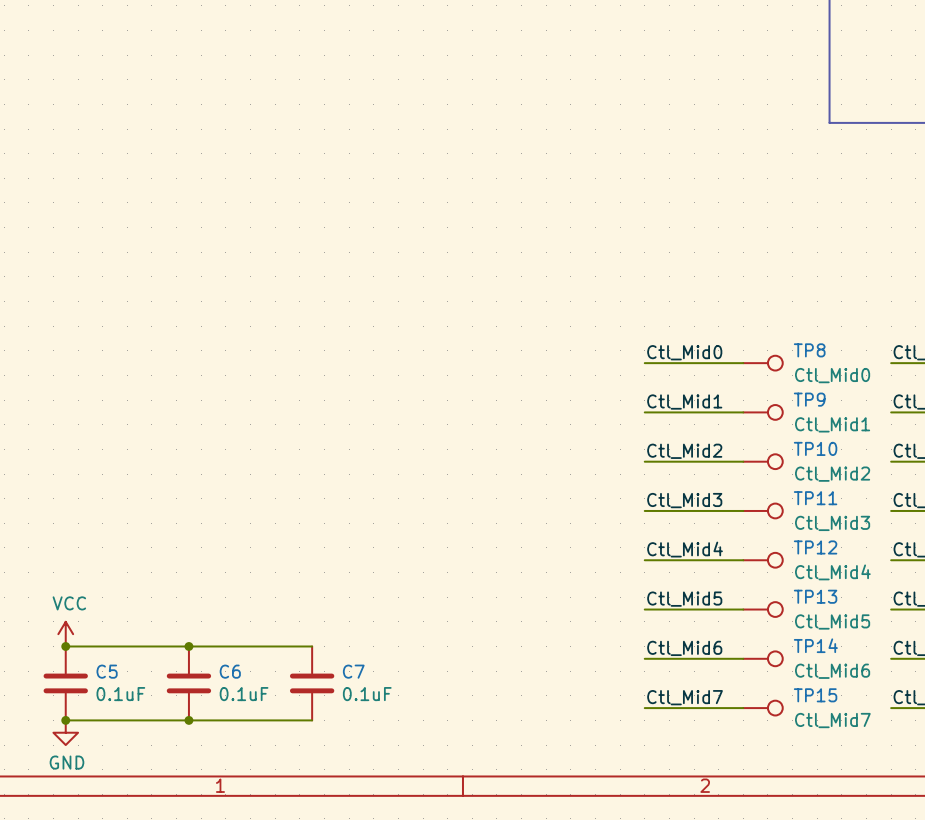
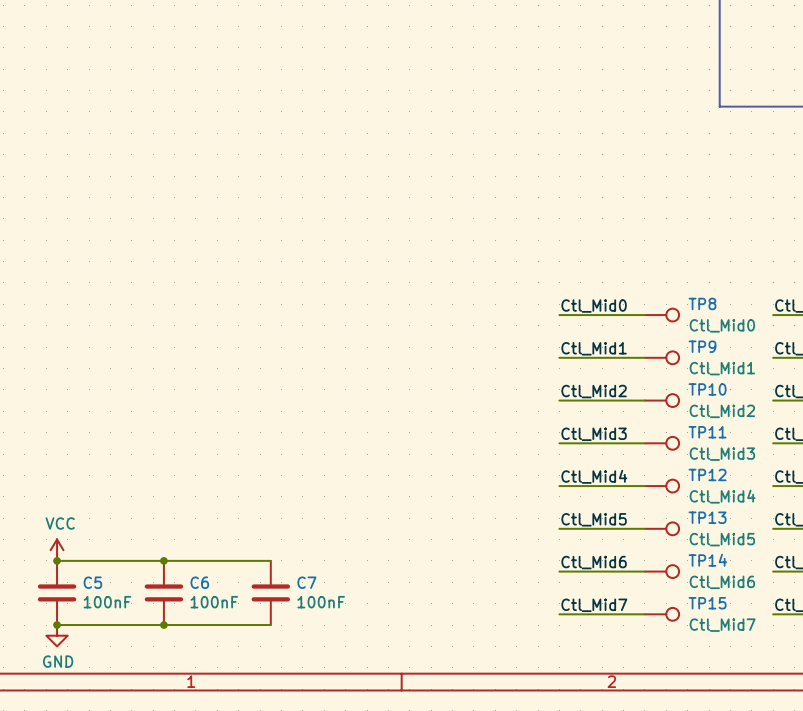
C5 value: 0.1uF (120, 694) -> 100nF (107, 602)
C6 value: 0.1uF (244, 694) -> 100nF (214, 602)
C7 value: 0.1uF (367, 694) -> 100nF (321, 602)

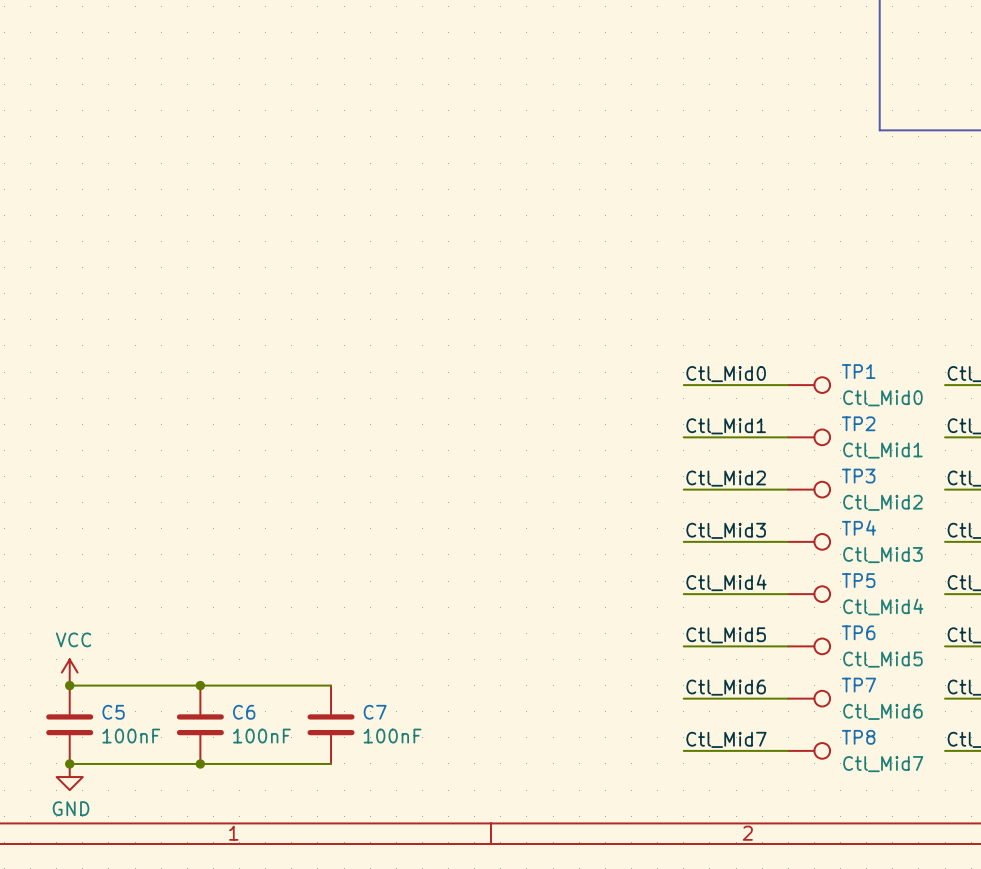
TP8 name: TP8 (702, 303) -> TP1 (858, 371)
TP9 name: TP9 (702, 346) -> TP2 (858, 423)
TP10 name: TP10 (707, 389) -> TP3 (858, 476)
TP11 name: TP11 (707, 432) -> TP4 (858, 528)
TP12 name: TP12 (707, 474) -> TP5 (858, 580)
TP13 name: TP13 (707, 517) -> TP6 (858, 632)
TP14 name: TP14 (707, 560) -> TP7 (858, 685)
TP15 name: TP15 (707, 603) -> TP8 (858, 737)

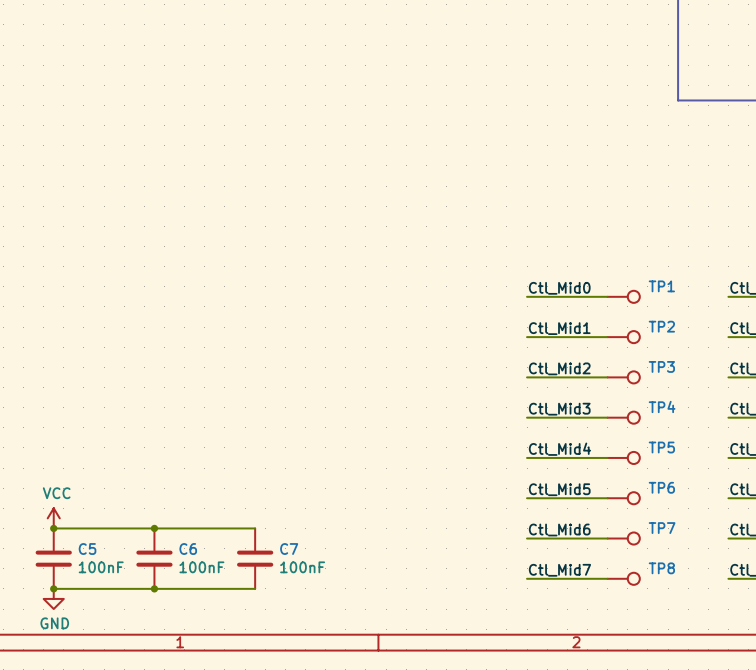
TP1 value: Ctl_Mid0 (882, 398) -> none
TP2 value: Ctl_Mid1 (882, 450) -> none
TP3 value: Ctl_Mid2 (882, 502) -> none
TP4 value: Ctl_Mid3 (882, 555) -> none
TP5 value: Ctl_Mid4 (883, 607) -> none
TP6 value: Ctl_Mid5 (882, 659) -> none
TP7 value: Ctl_Mid6 (882, 711) -> none
TP8 value: Ctl_Mid7 (883, 764) -> none

